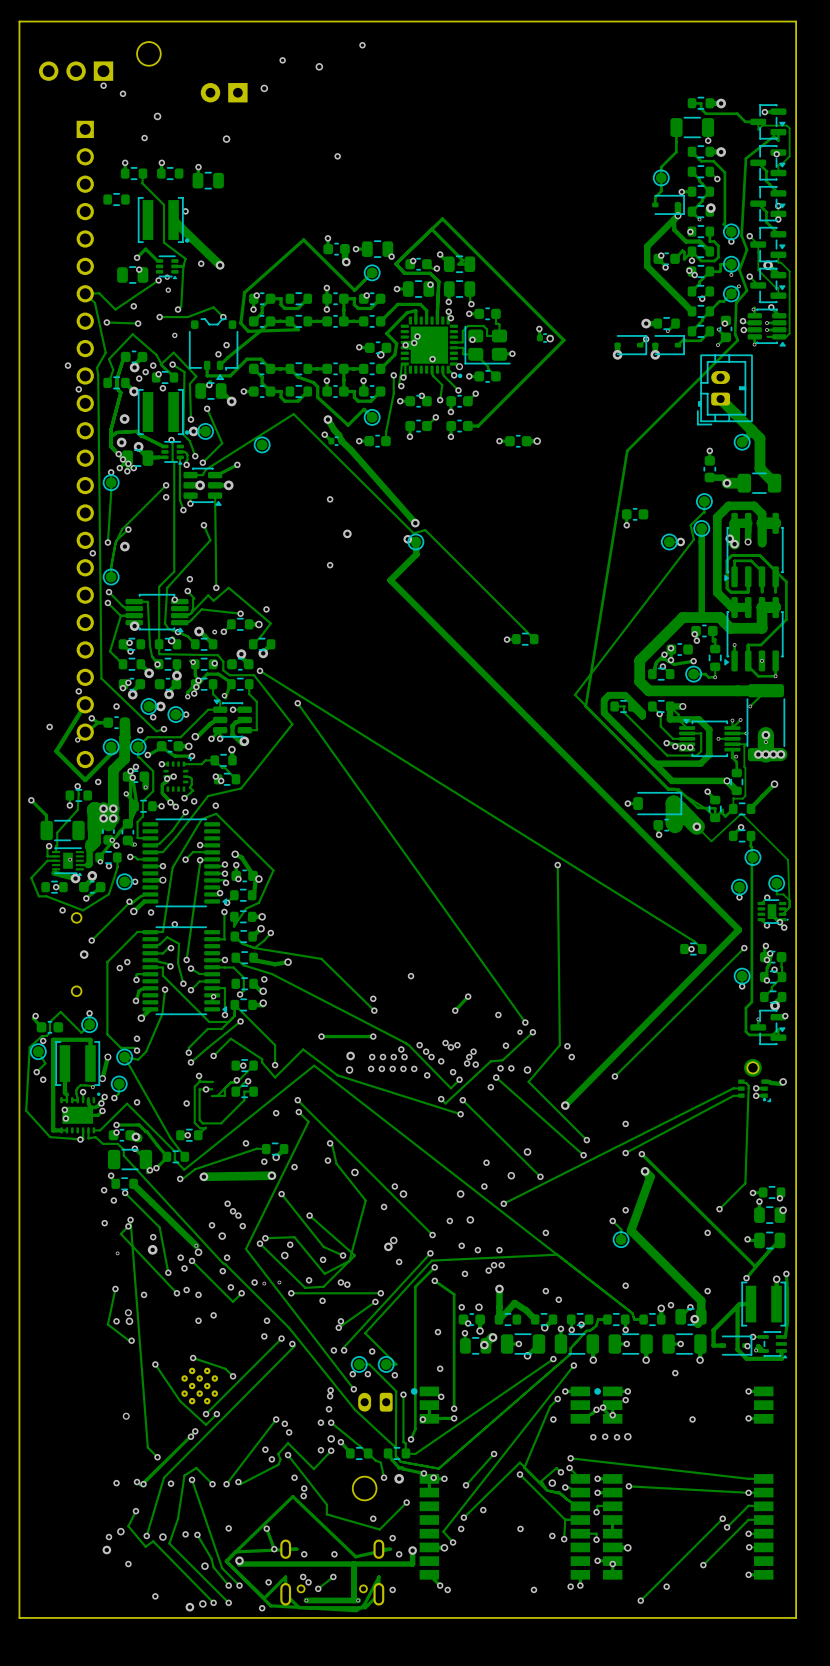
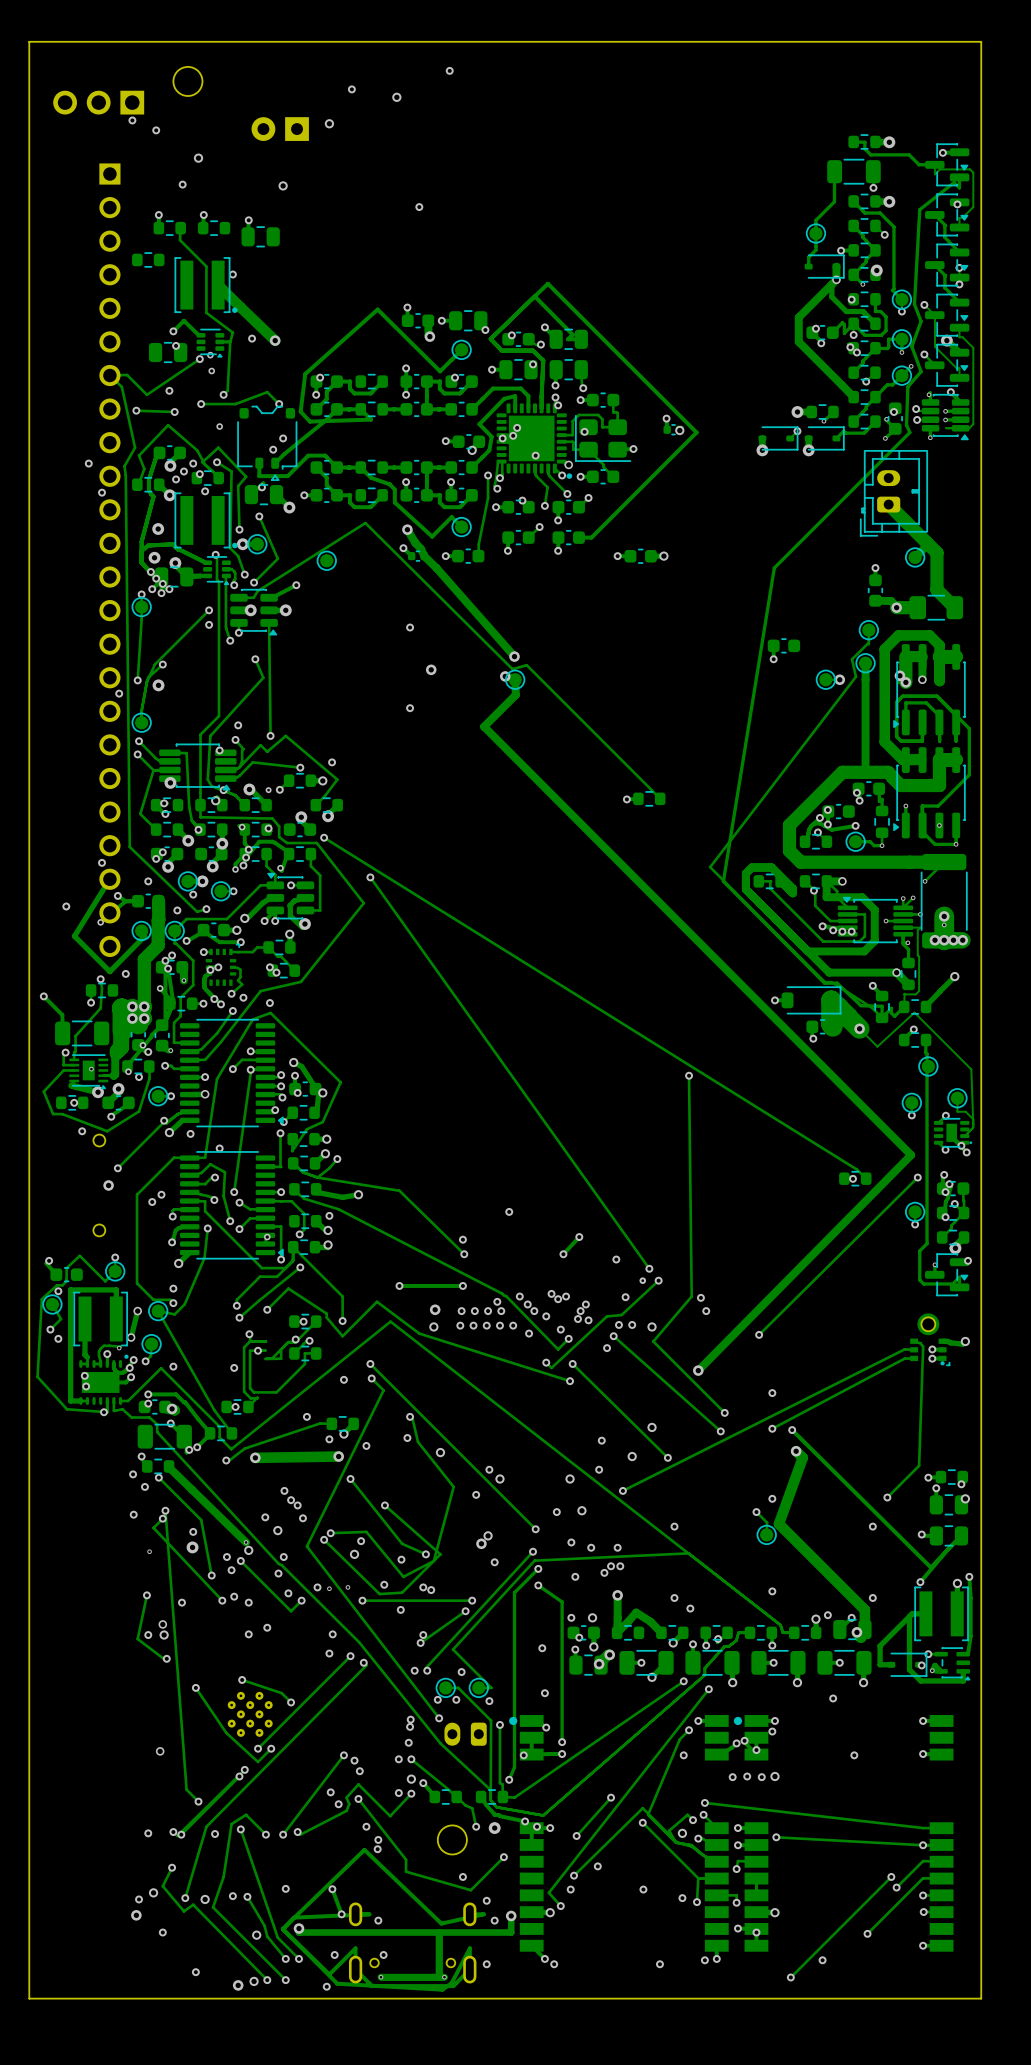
via: (334, 1554) -> none
via: (303, 1576) -> none
track: (333, 1576) (318, 1588) -> none
via: (333, 1576) -> none
via: (318, 1588) -> none

